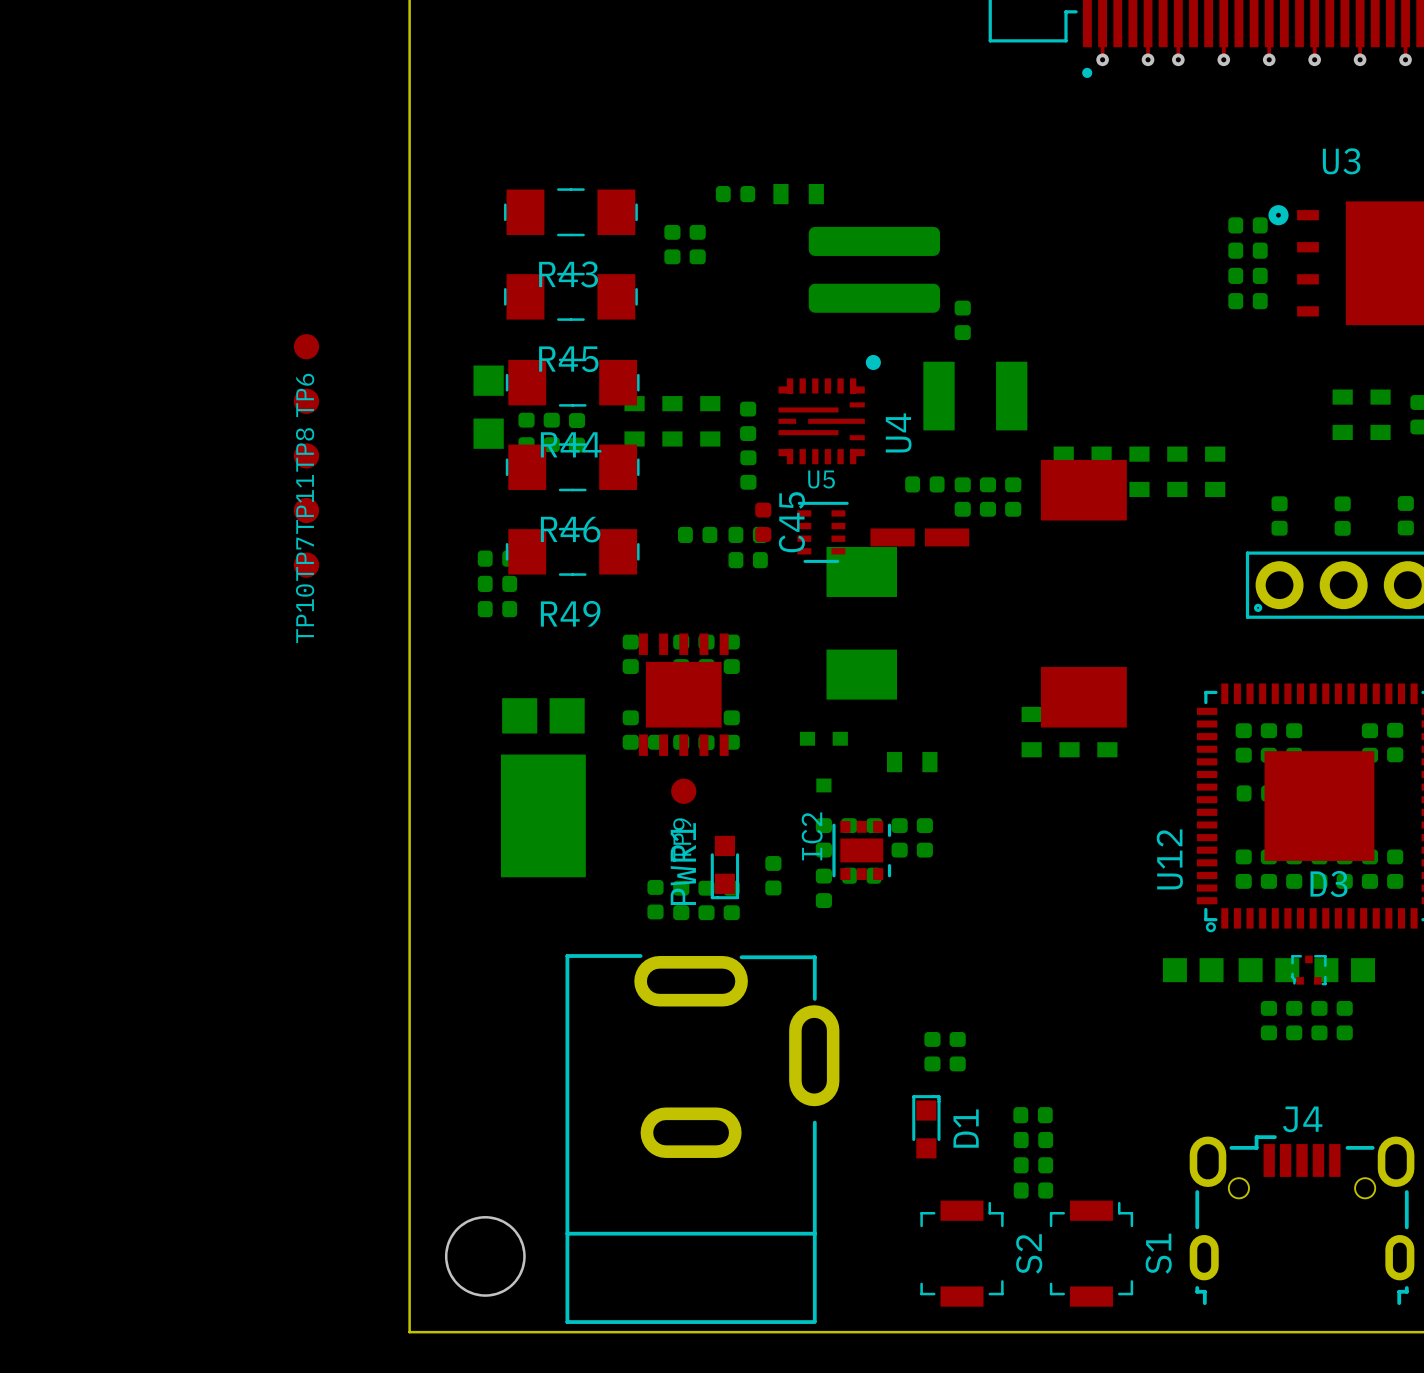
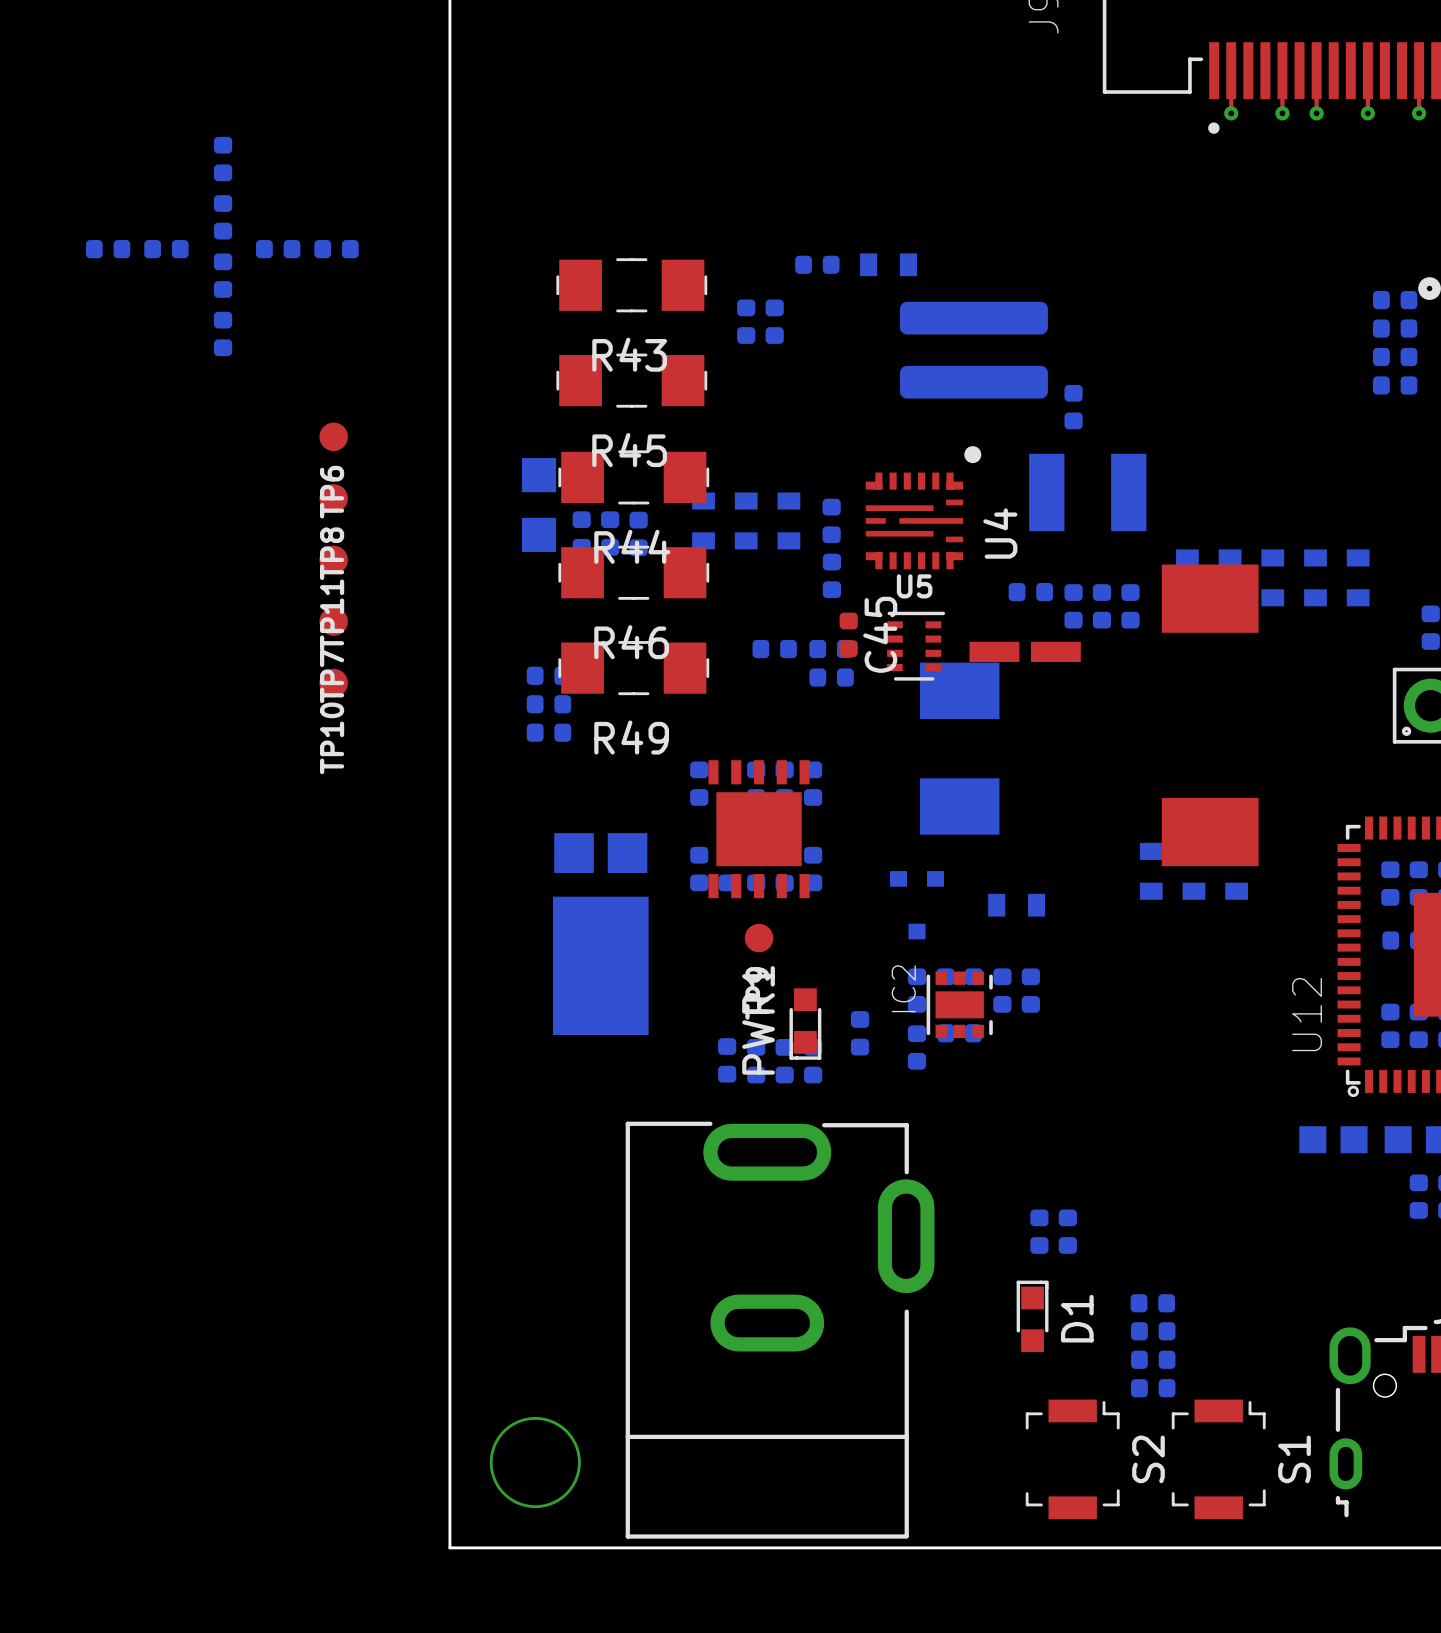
part: none -> (223, 159)
part: none -> (223, 217)
part: none -> (108, 249)
part: none -> (166, 249)
part: none -> (278, 249)
part: none -> (336, 249)
part: none -> (223, 275)
part: none -> (223, 333)

